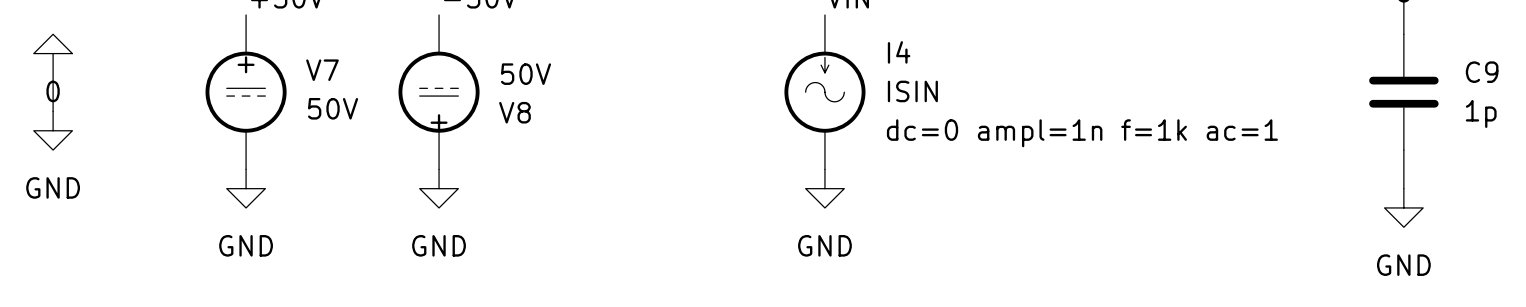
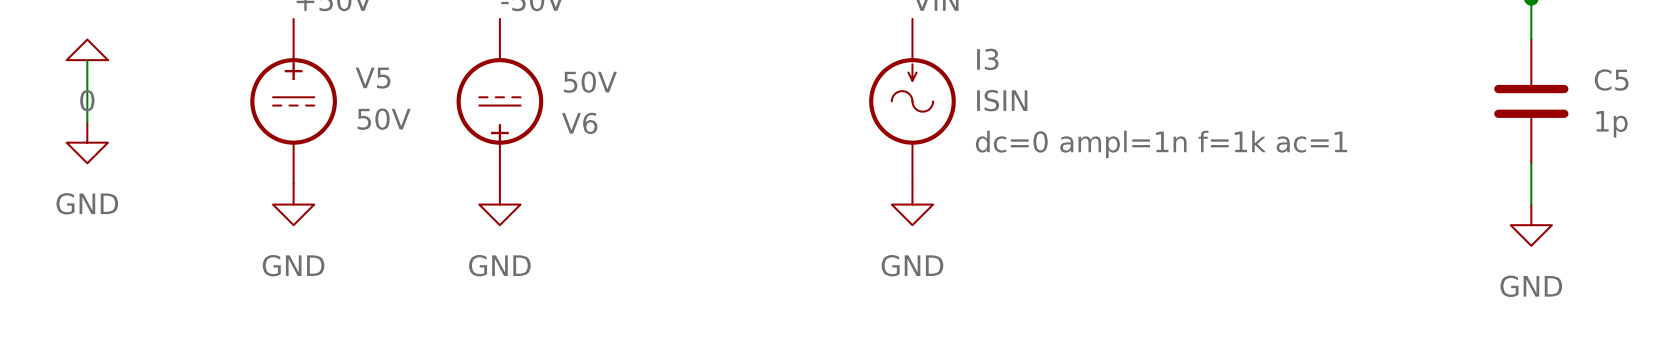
I4 name: I4 (899, 52) -> I3 (987, 59)
V7 name: V7 (322, 70) -> V5 (373, 78)
C9 name: C9 (1482, 72) -> C5 (1611, 80)
V8 name: V8 (514, 112) -> V6 (579, 123)

